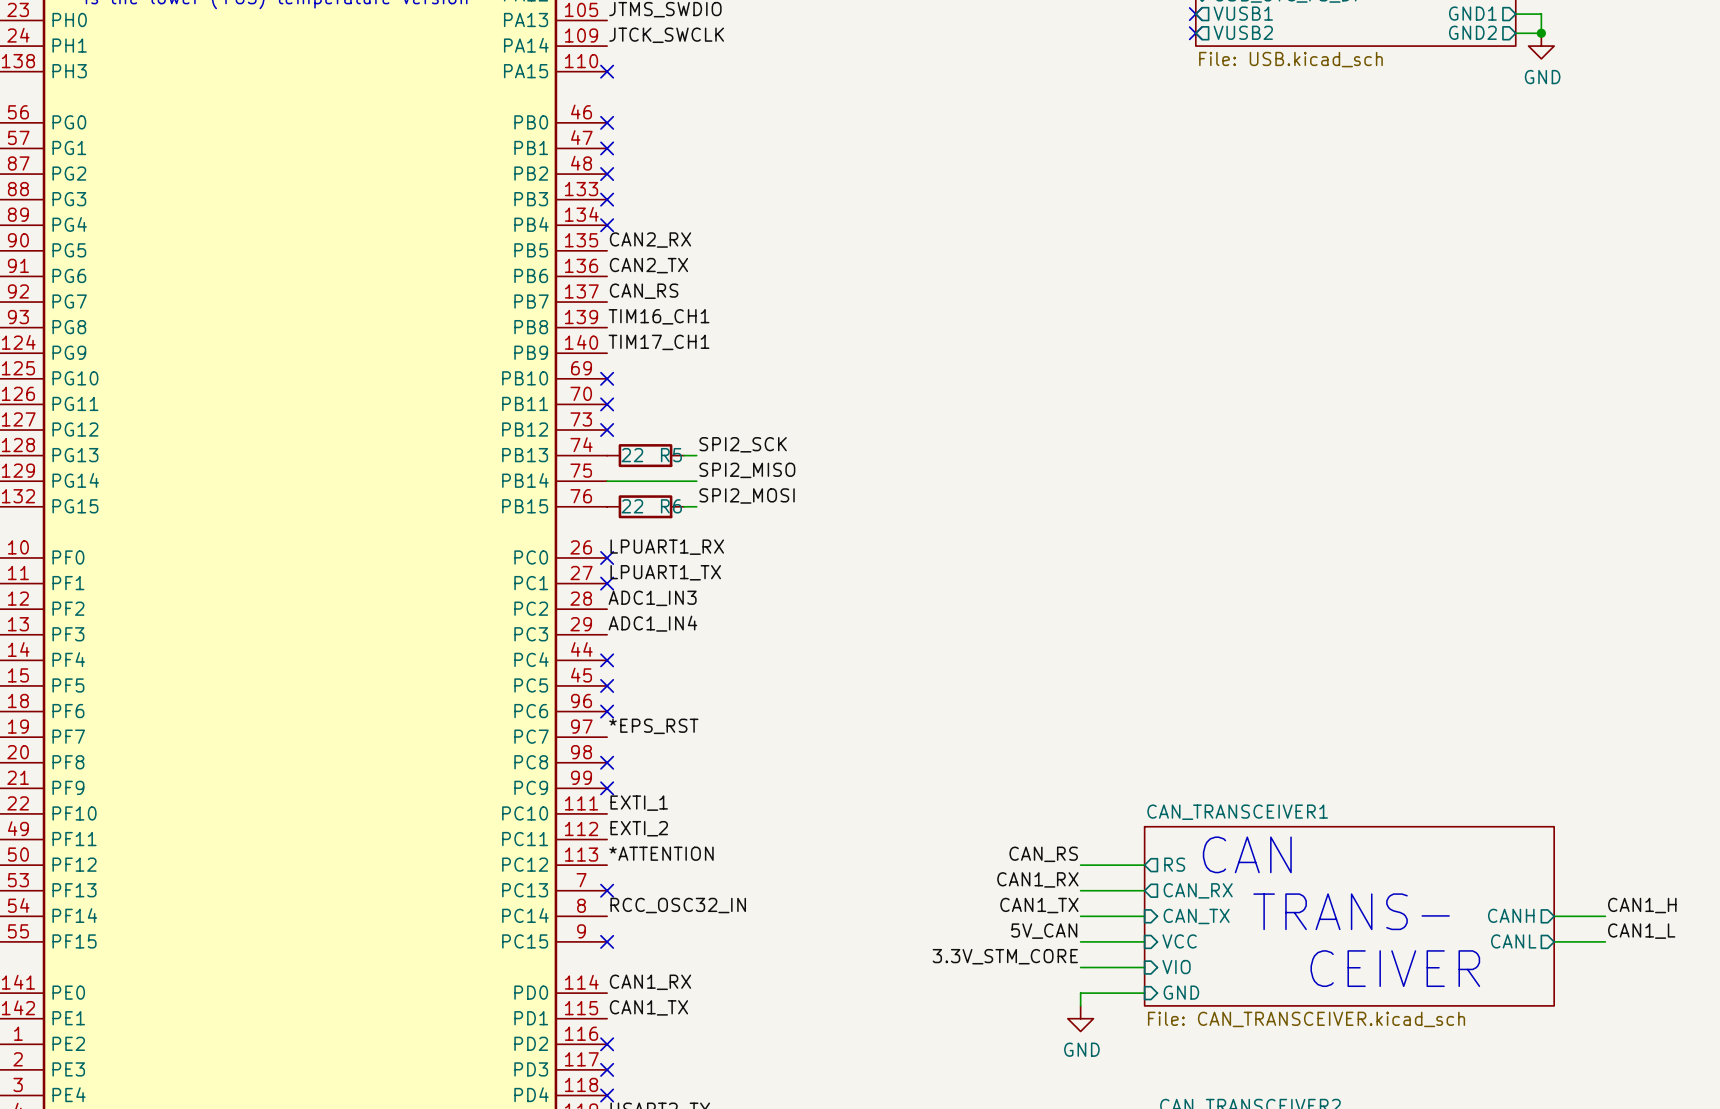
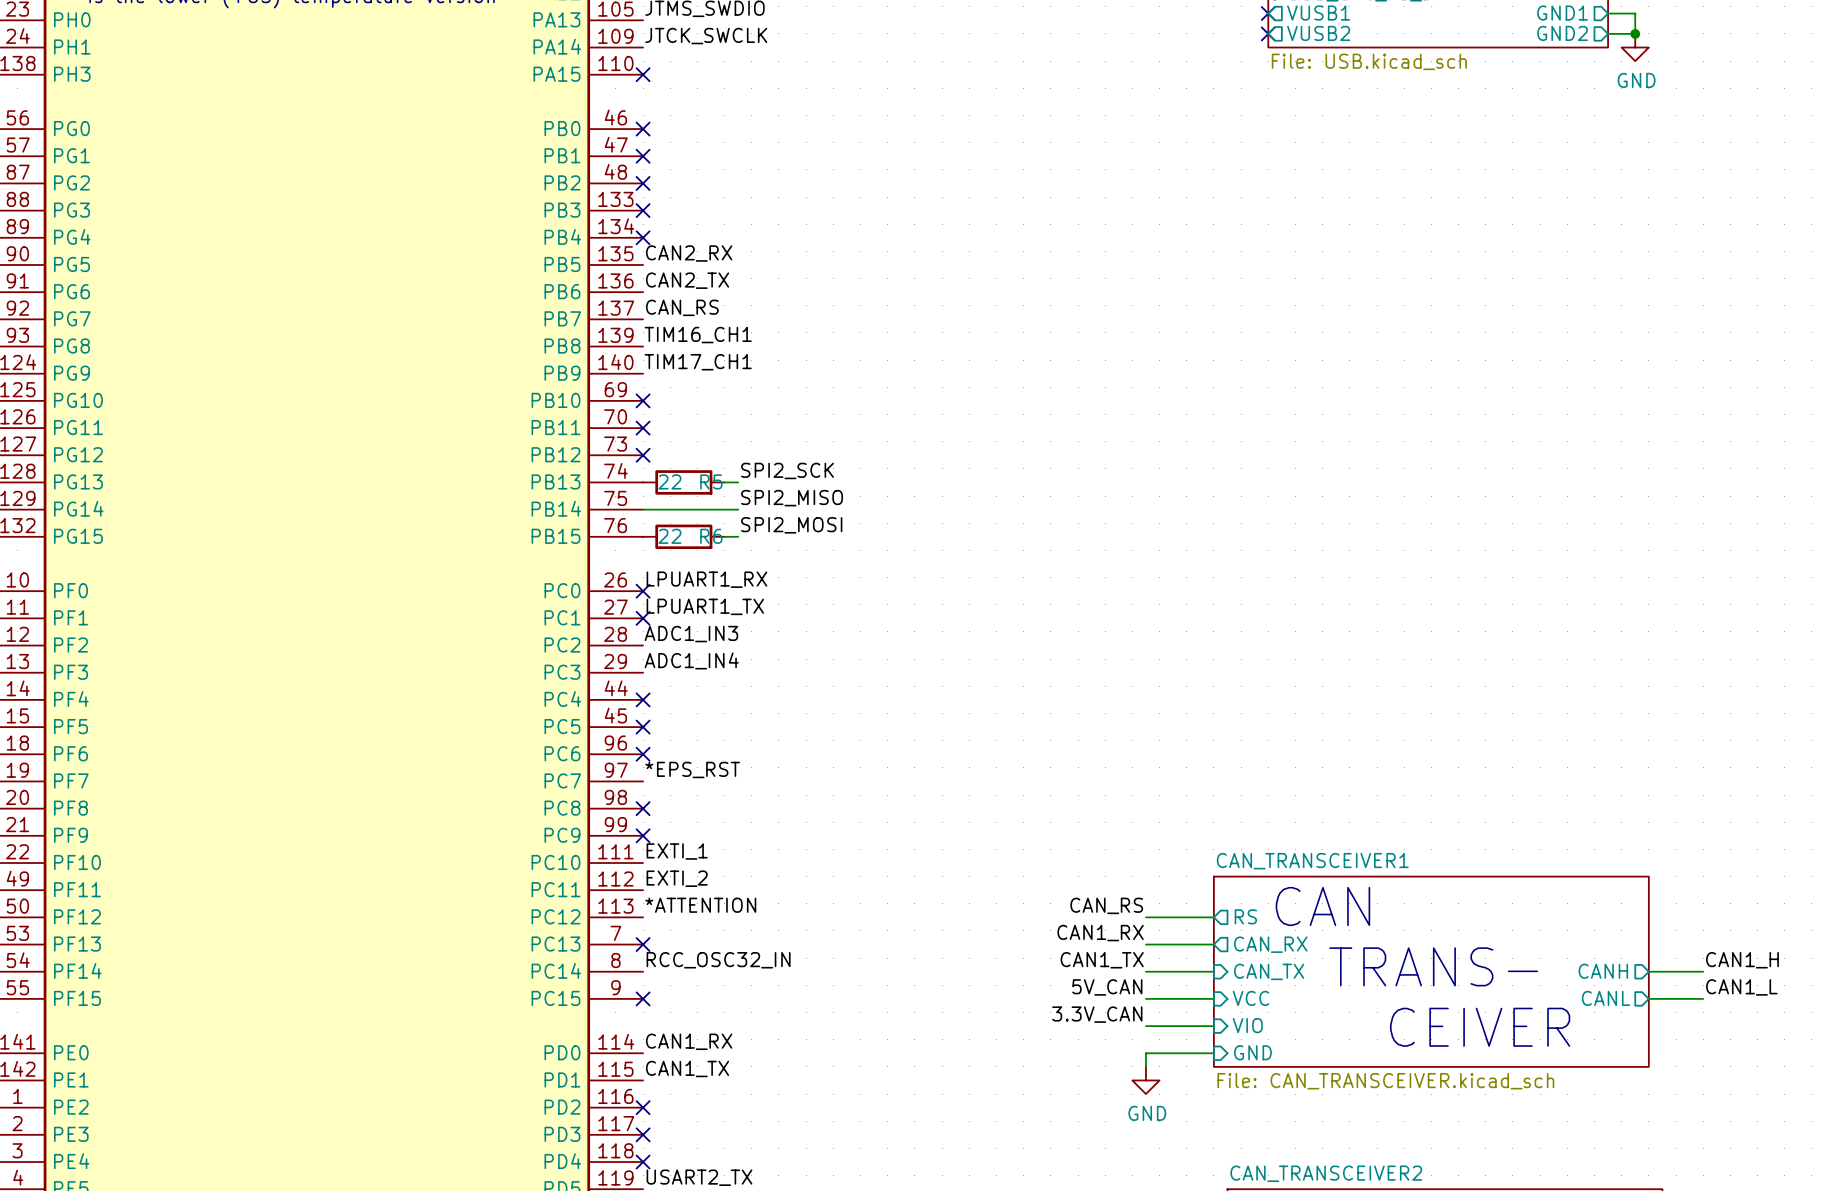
label: 3.3V_STM_CORE (1005, 956) -> 3.3V_CAN (1097, 1014)

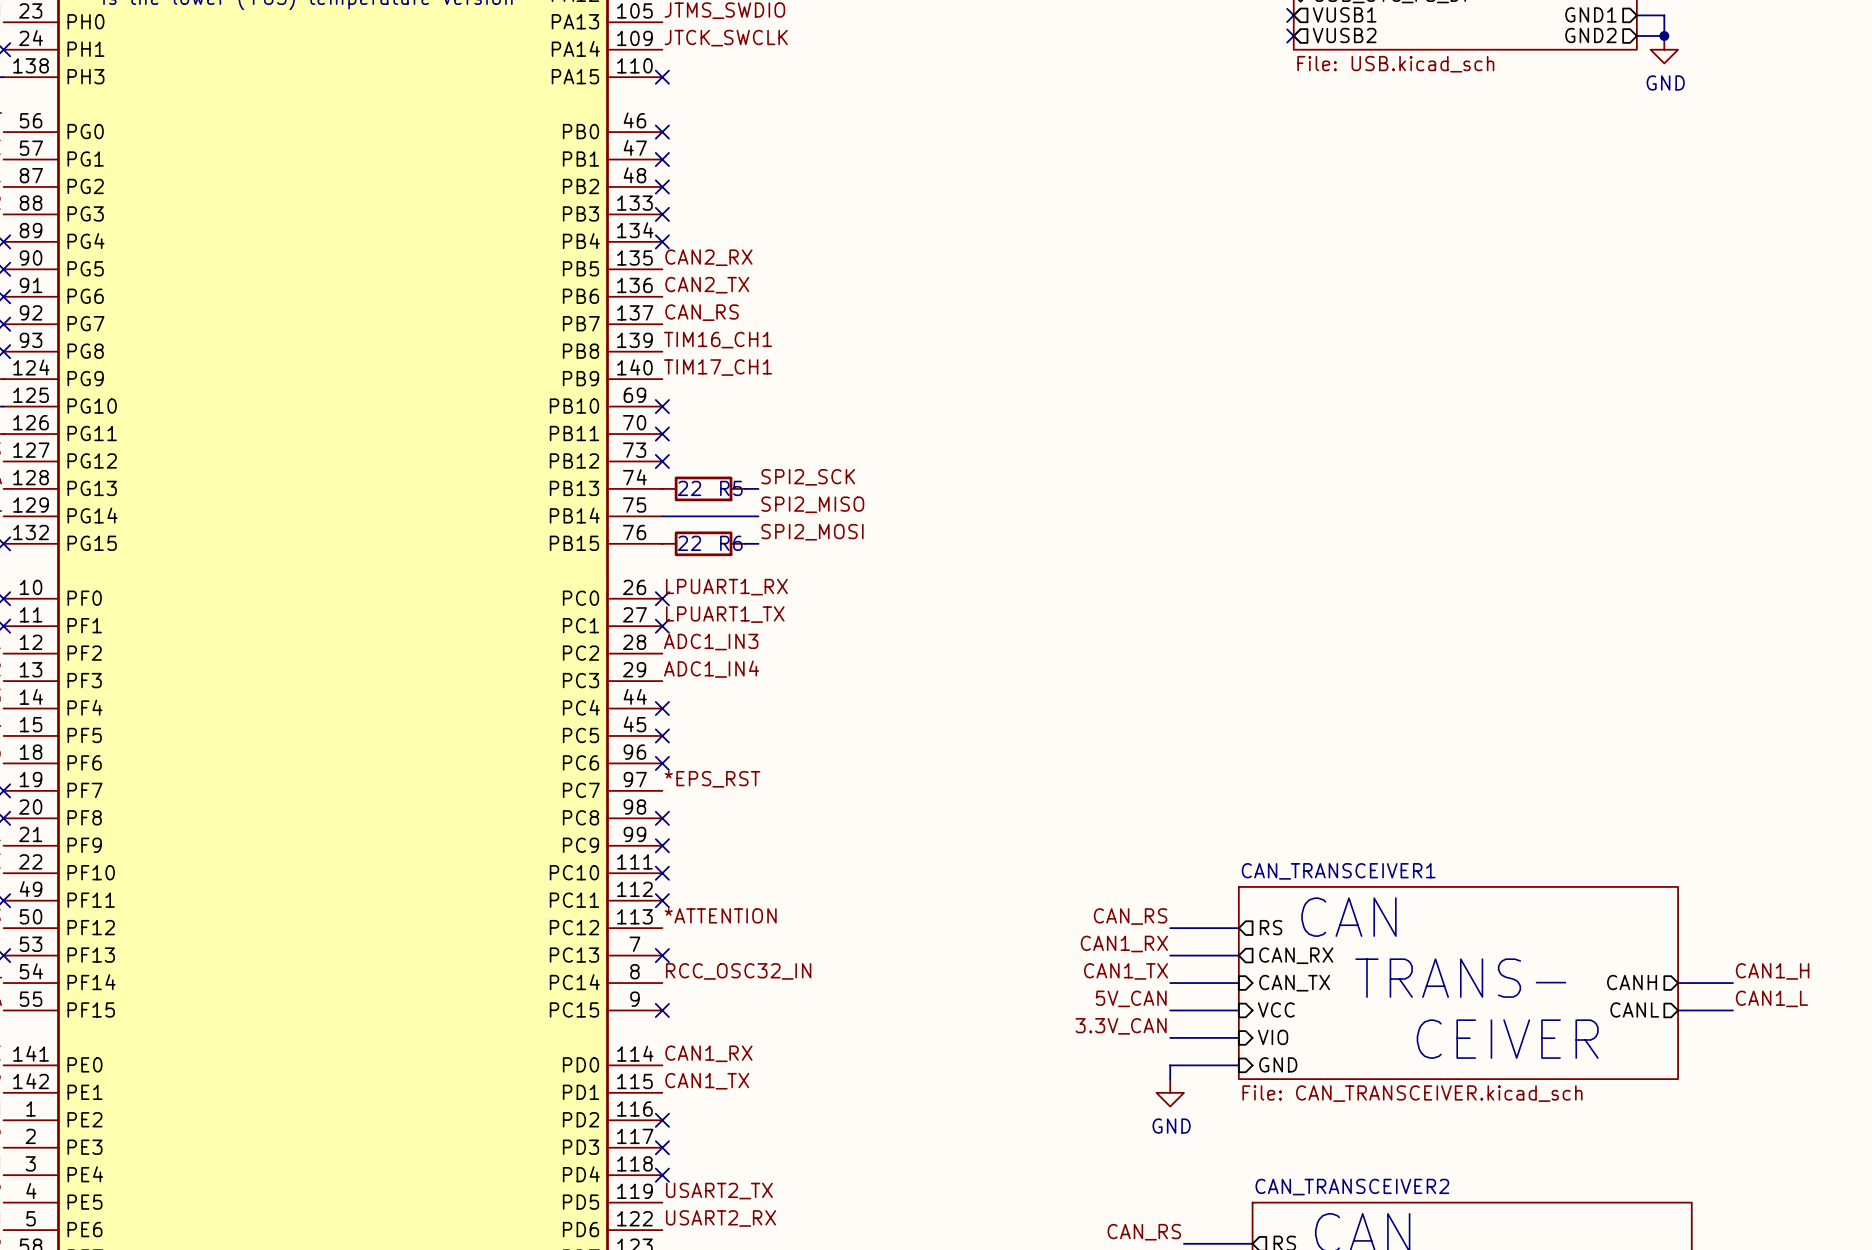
label: EXTI_1 (677, 851) -> none
no-connect mark: none -> (662, 873)
label: EXTI_2 (677, 878) -> none
no-connect mark: none -> (662, 900)

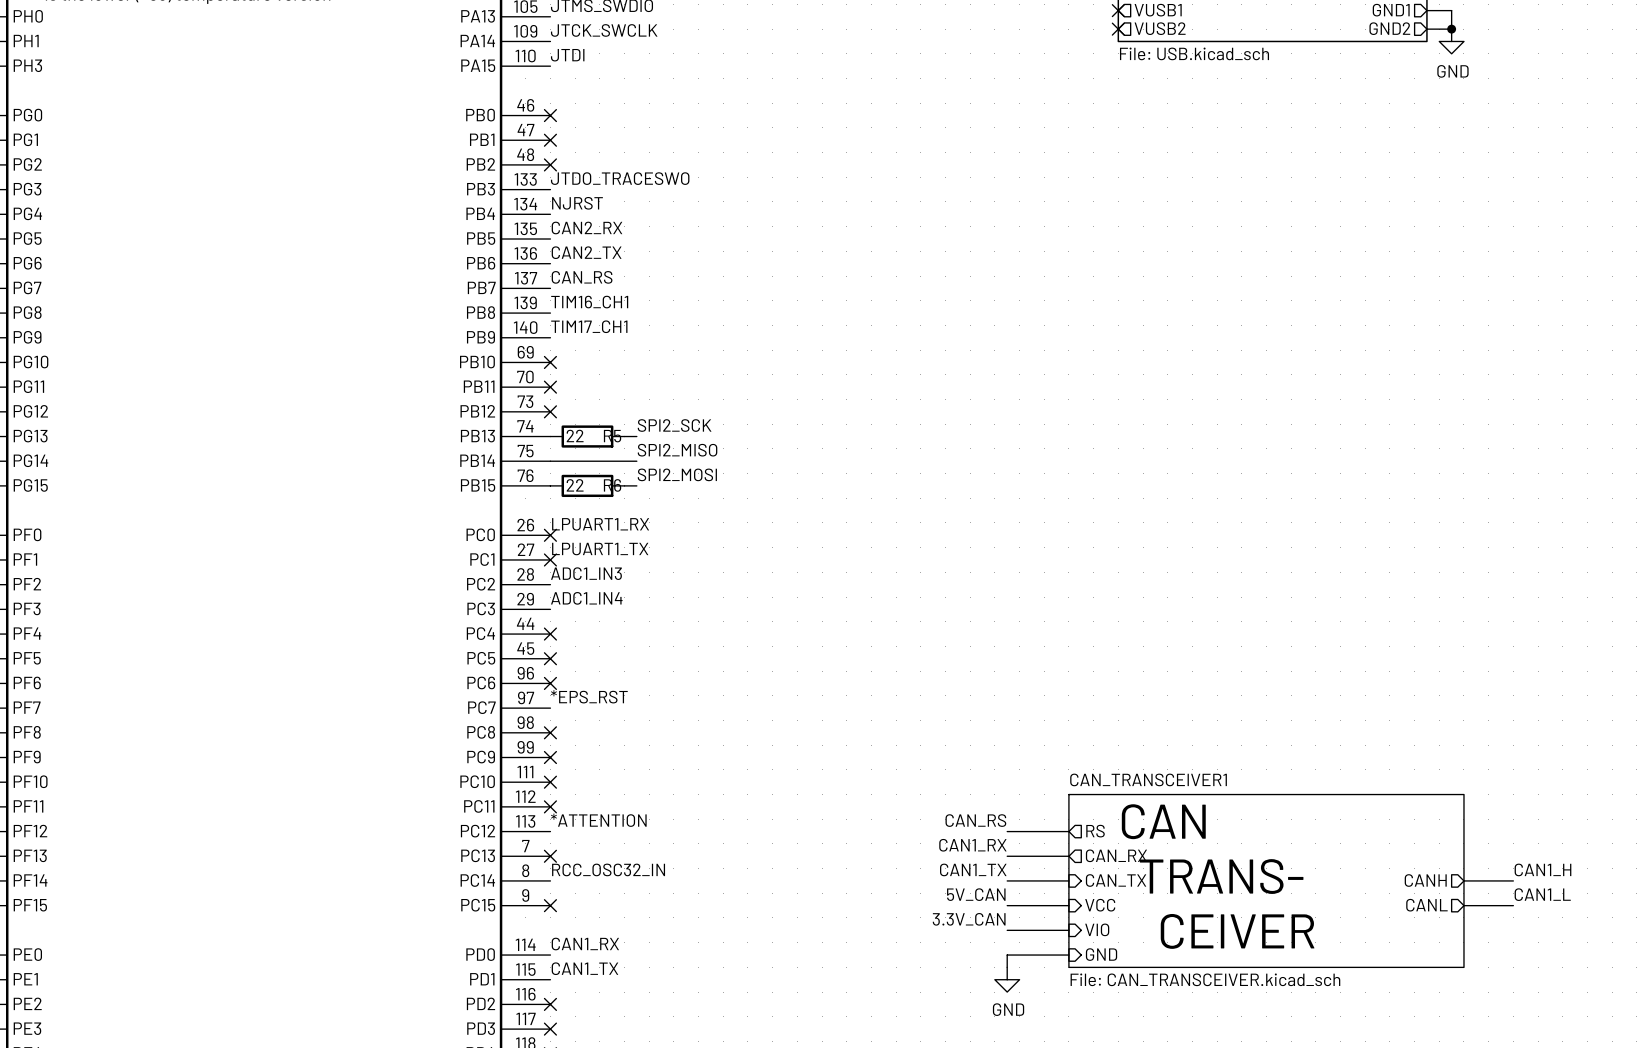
label: none -> JTDI (567, 55)
no-connect mark: (662, 77) -> none
label: none -> JTDO_TRACESWO (620, 178)
no-connect mark: (662, 214) -> none
label: none -> NJRST (577, 203)
no-connect mark: (662, 241) -> none

